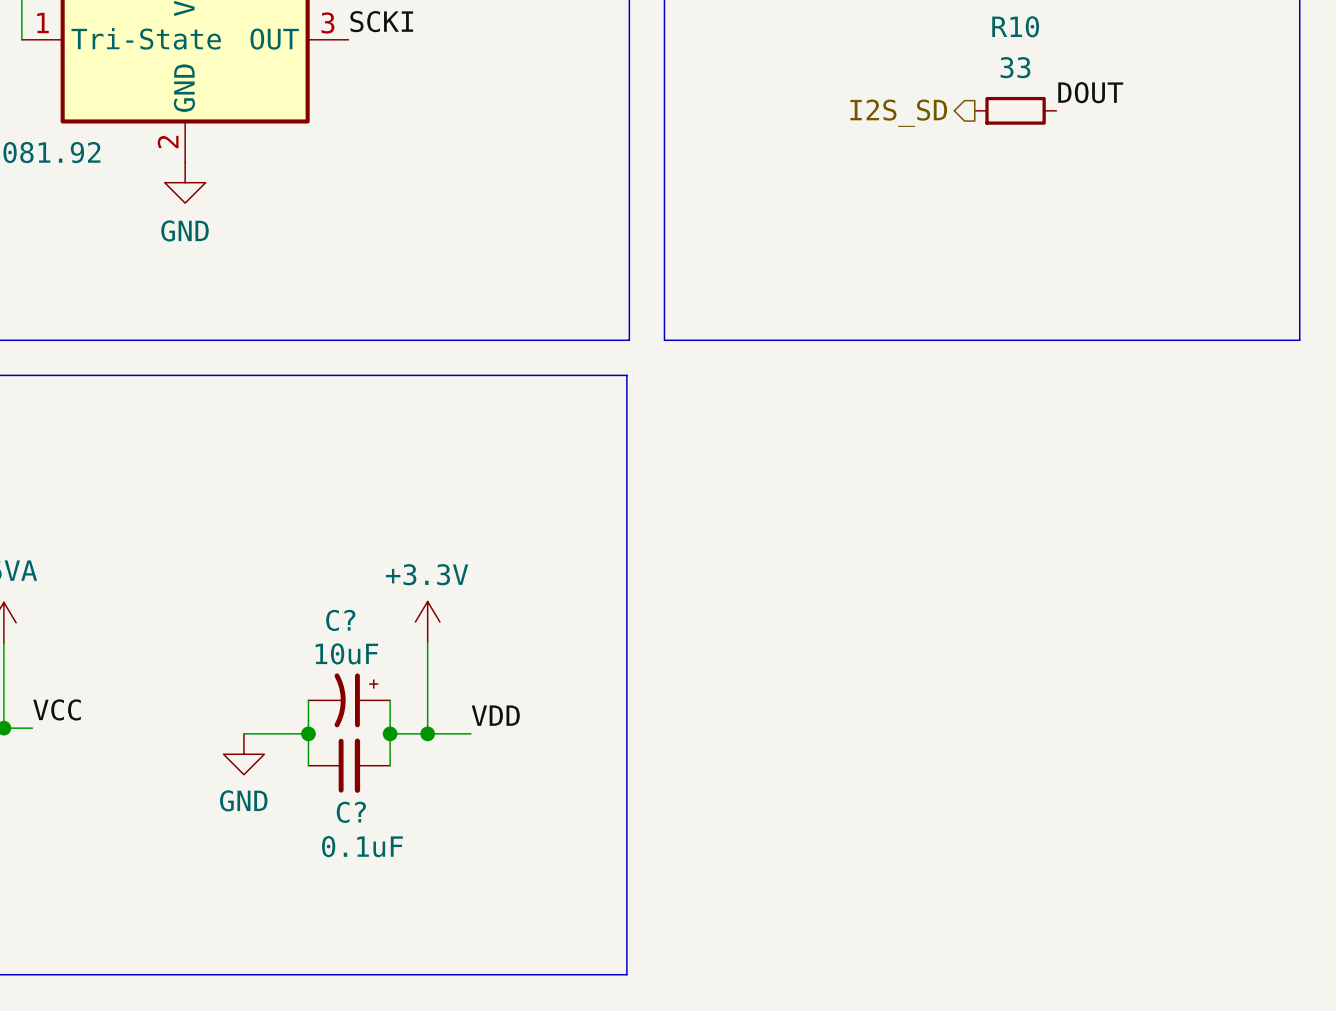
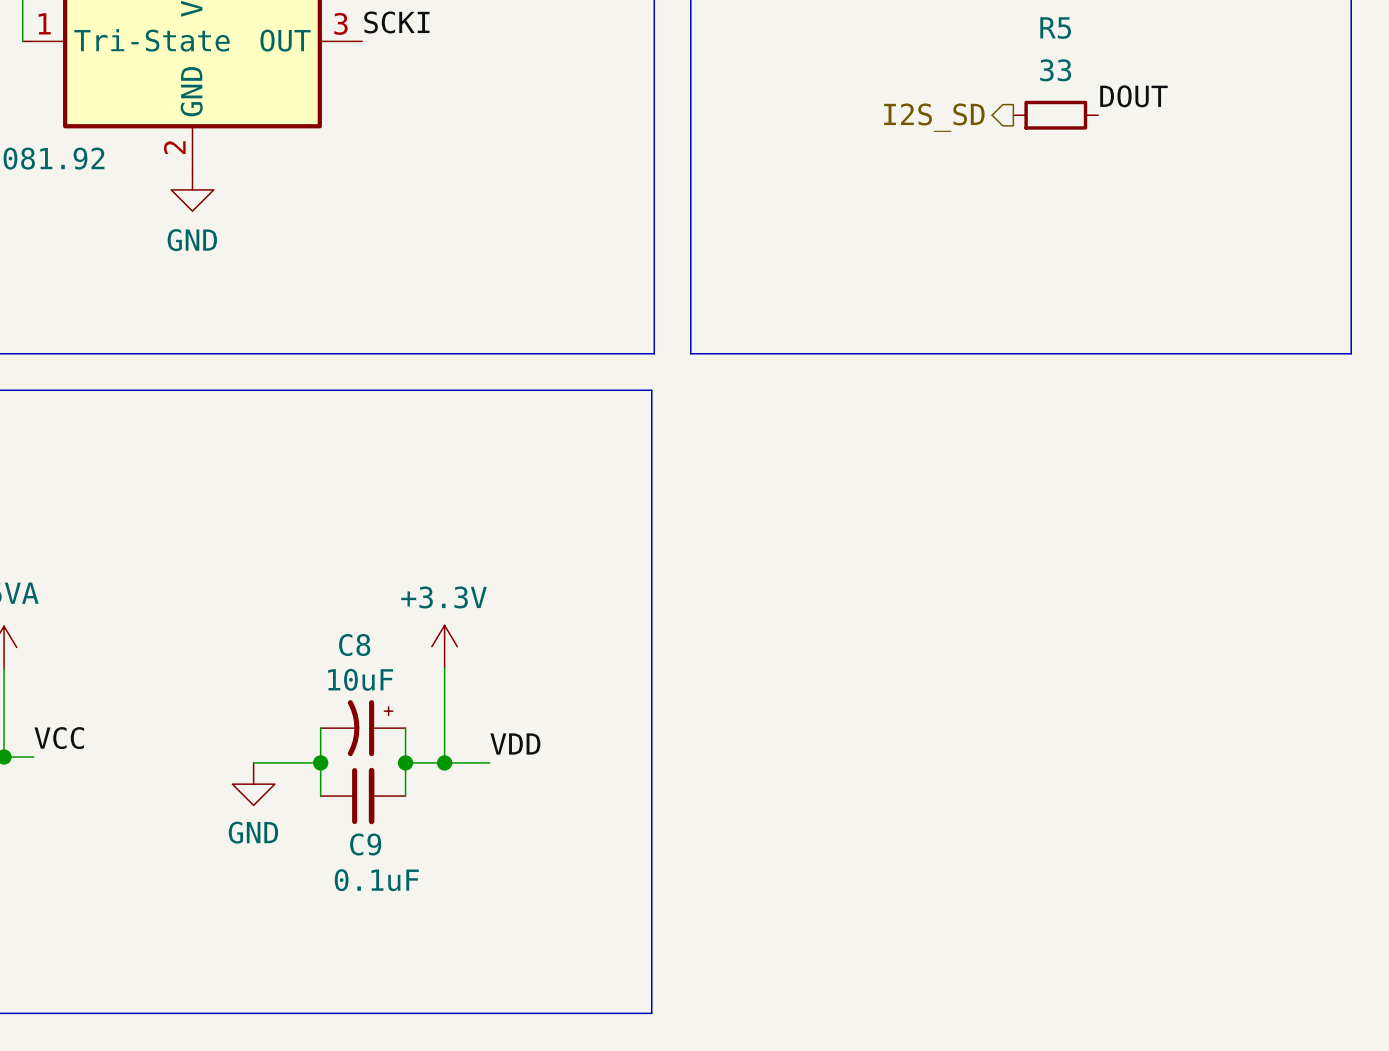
R10 name: R10 (1015, 26) -> R5 (1055, 28)
C? name: C? (340, 620) -> C8 (354, 645)
C? name: C? (351, 812) -> C9 (365, 844)

